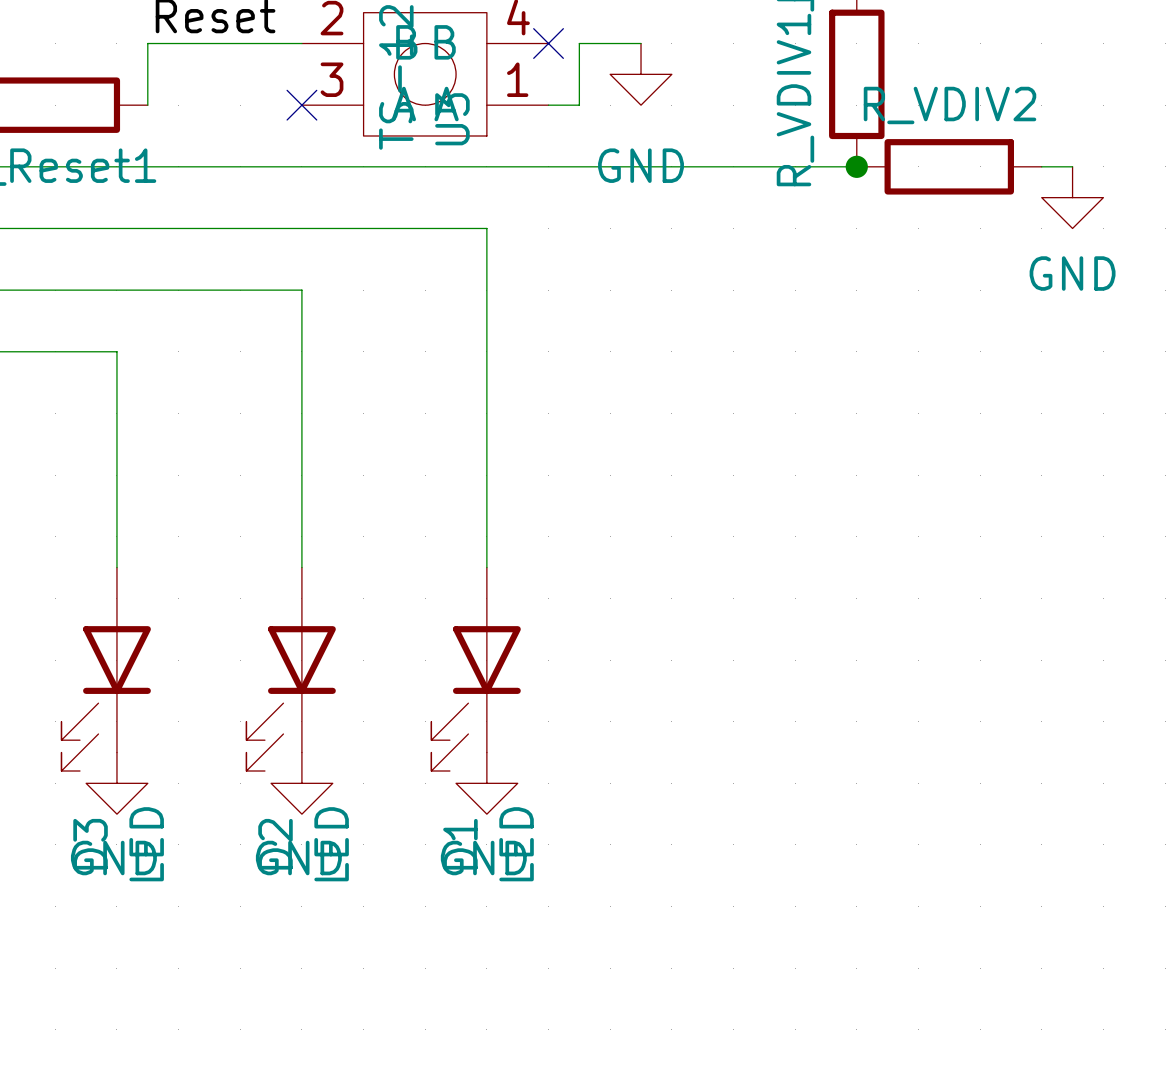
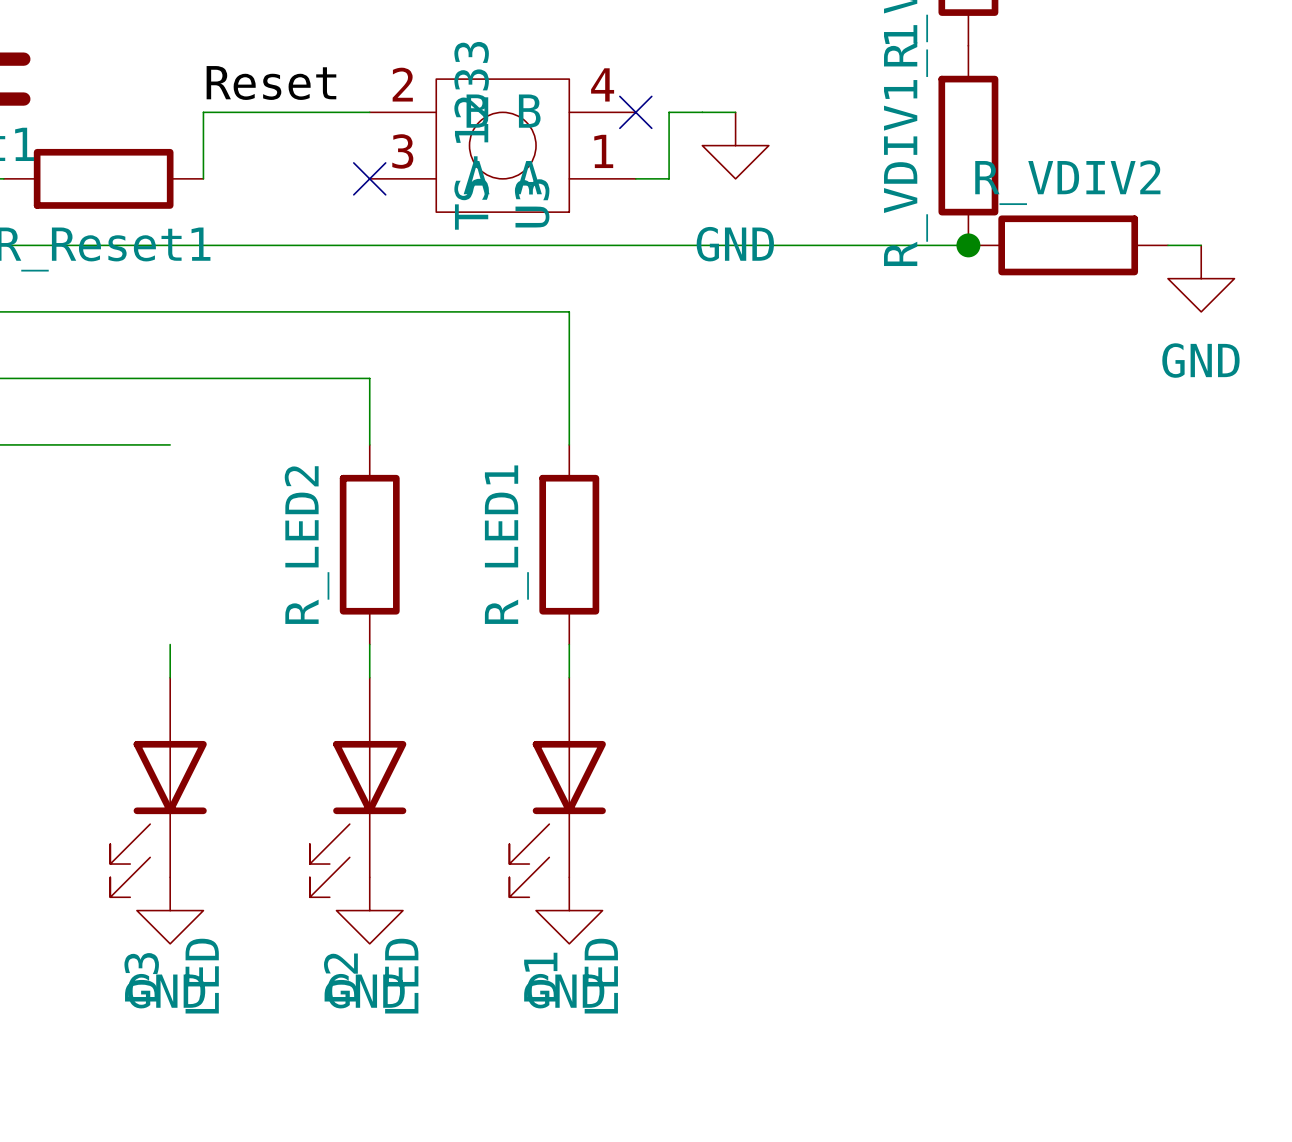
wire: (116, 351) (116, 536) -> none
wire: (301, 351) (301, 536) -> none
wire: (486, 351) (486, 536) -> none
R_LED2: none -> (369, 544)
R_LED1: none -> (569, 544)

